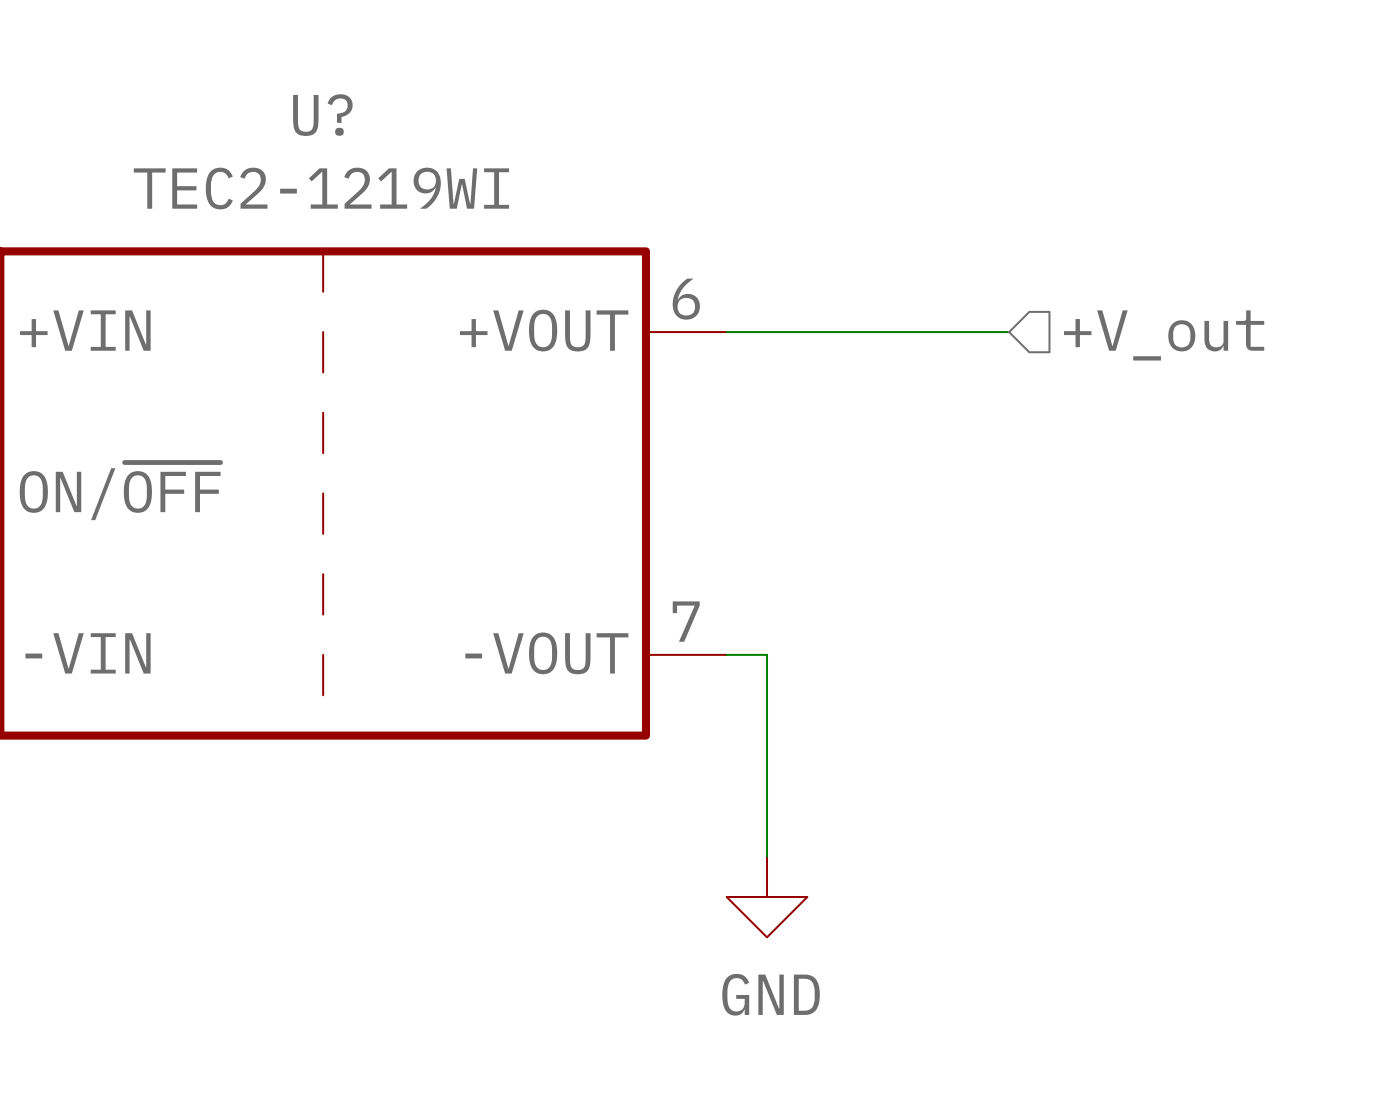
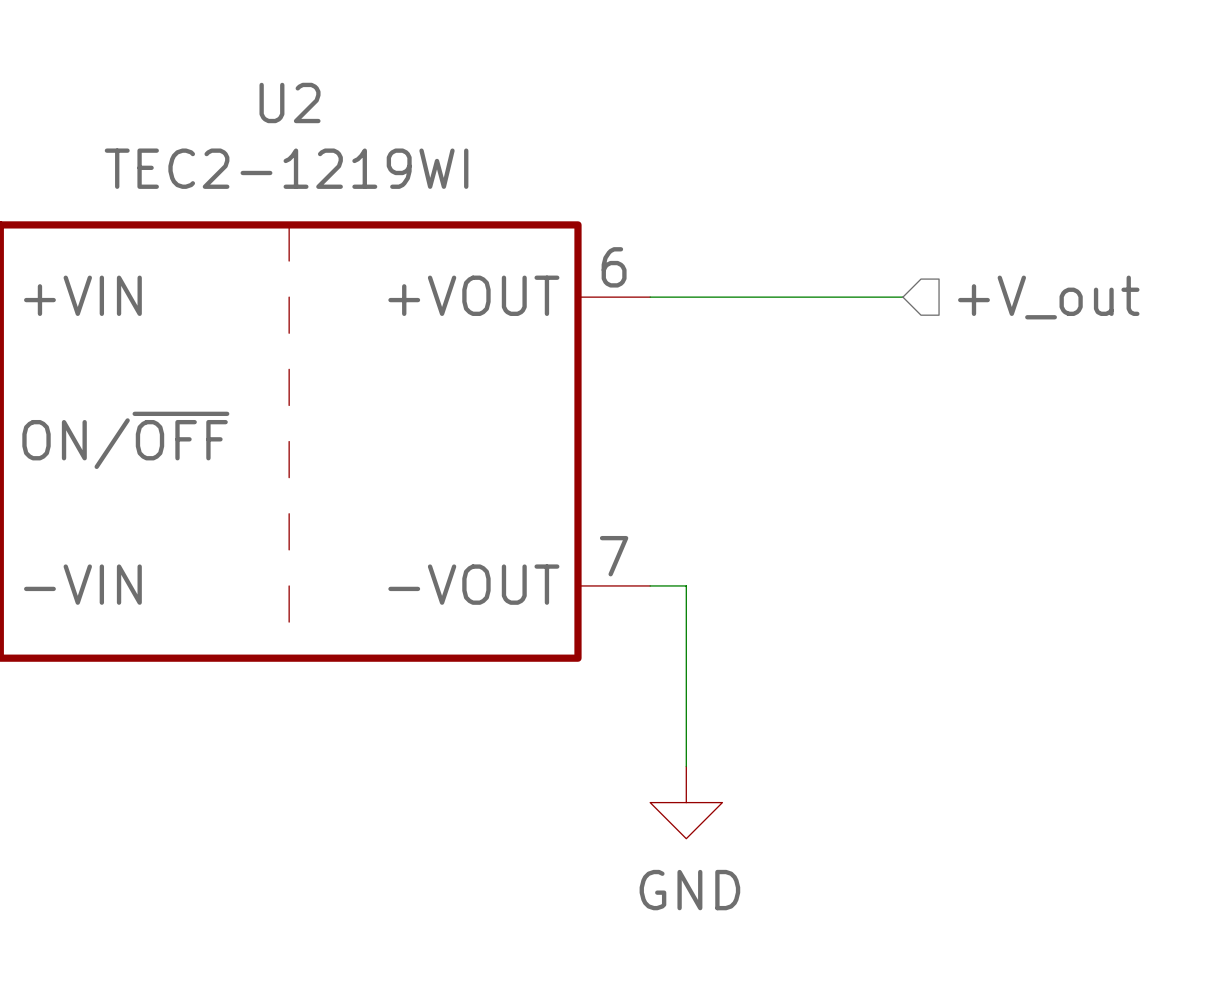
U? name: U? (322, 115) -> U2 (290, 102)

